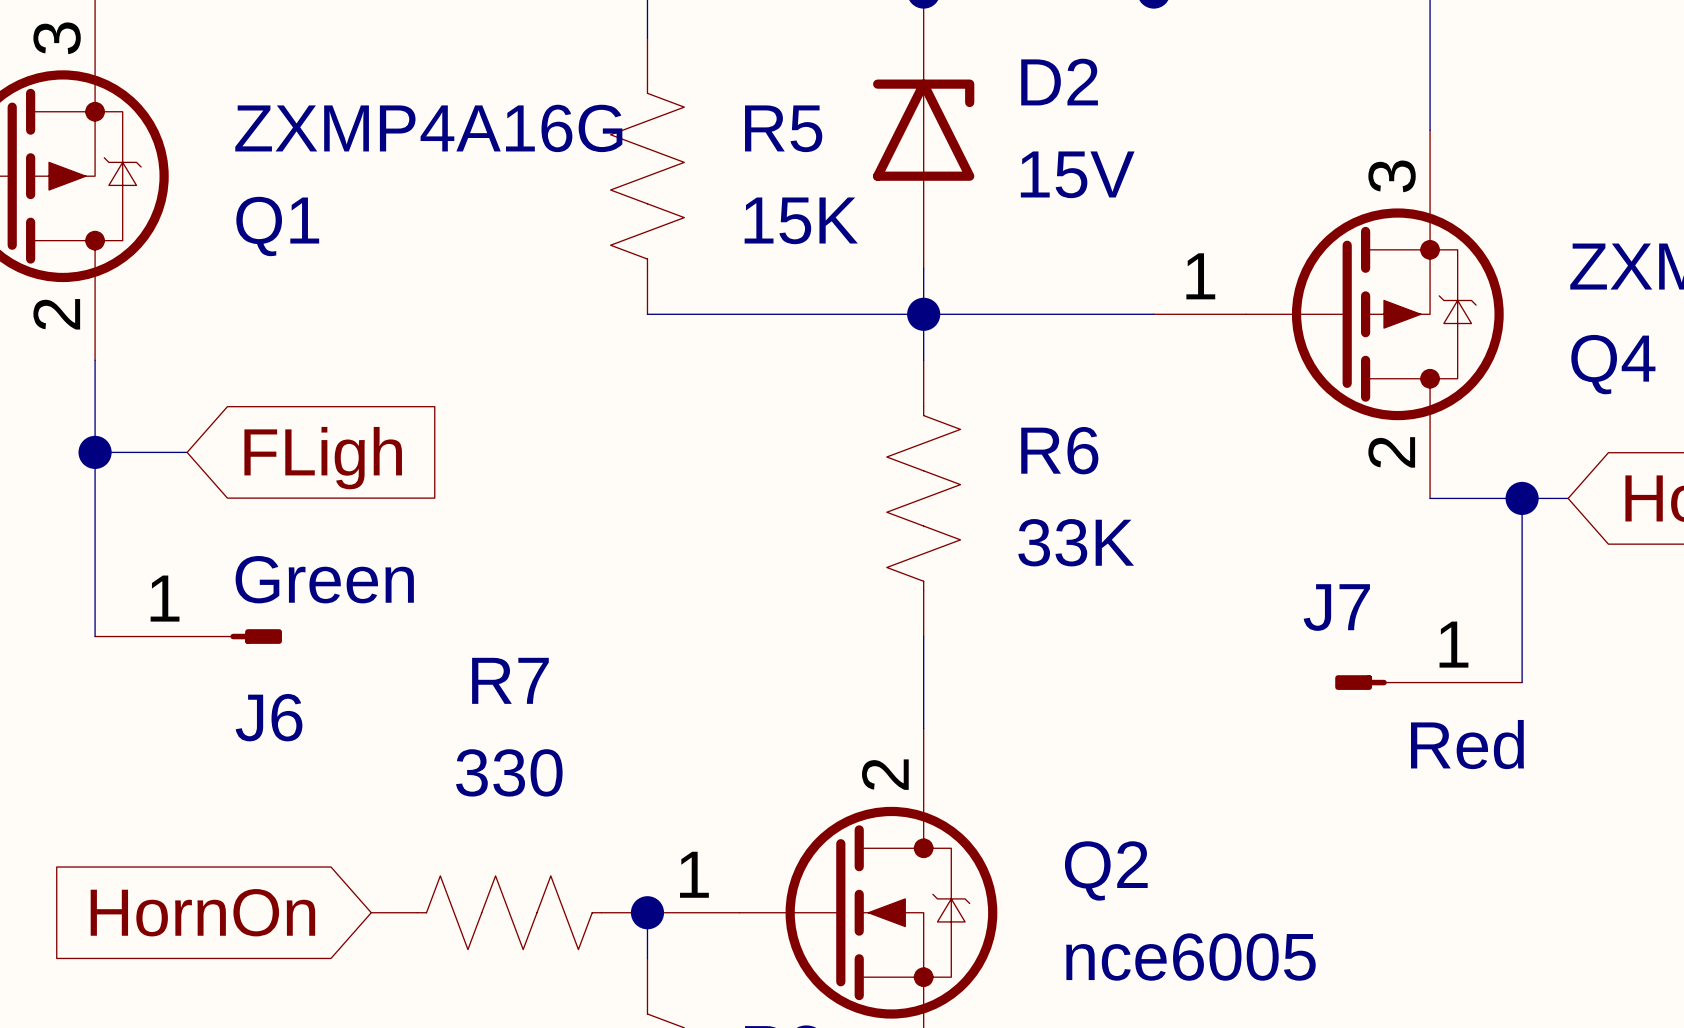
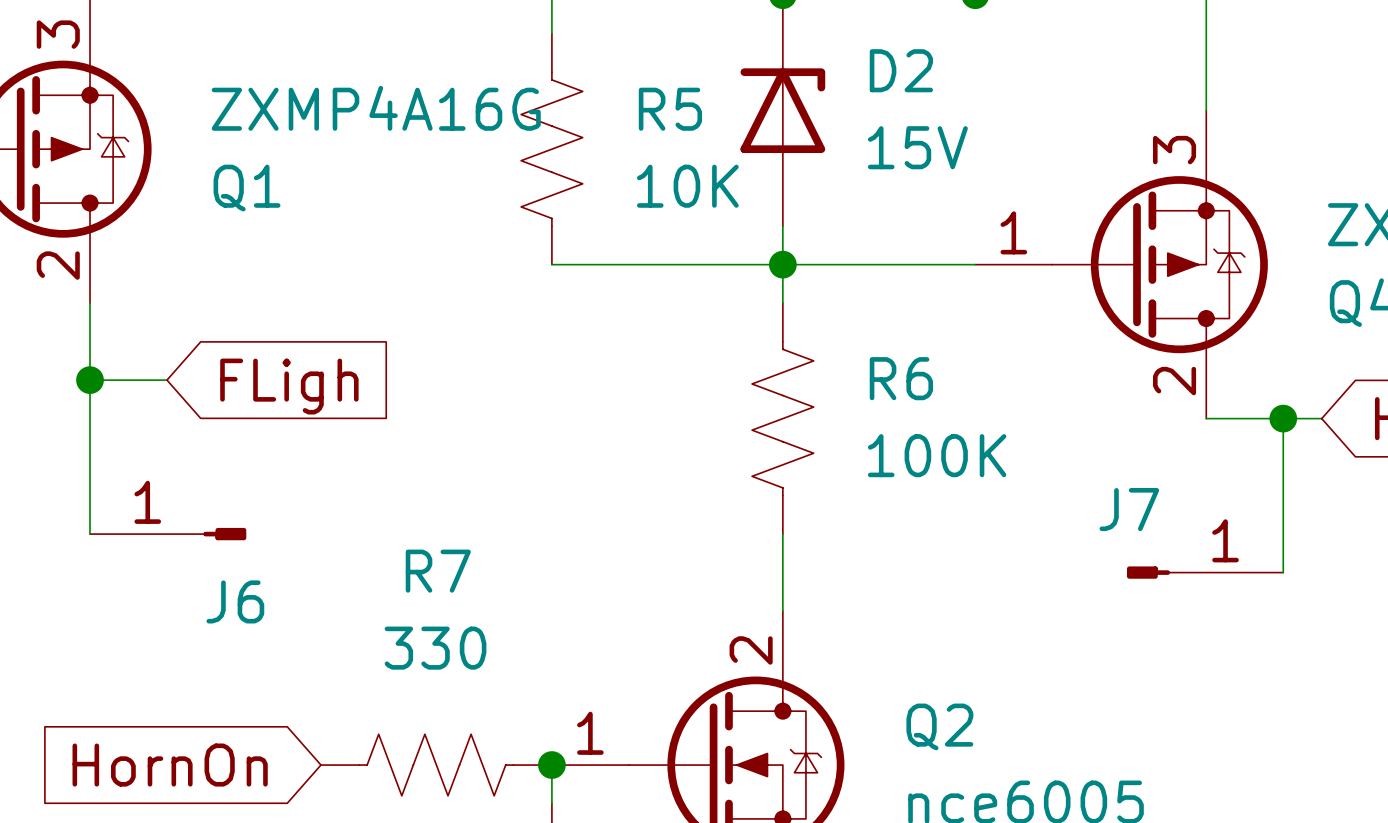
R5 value: 15K (801, 220) -> 10K (687, 186)
R6 value: 33K (1076, 542) -> 100K (937, 455)
text: Green (324, 579) -> none
text: Red (1467, 744) -> none

